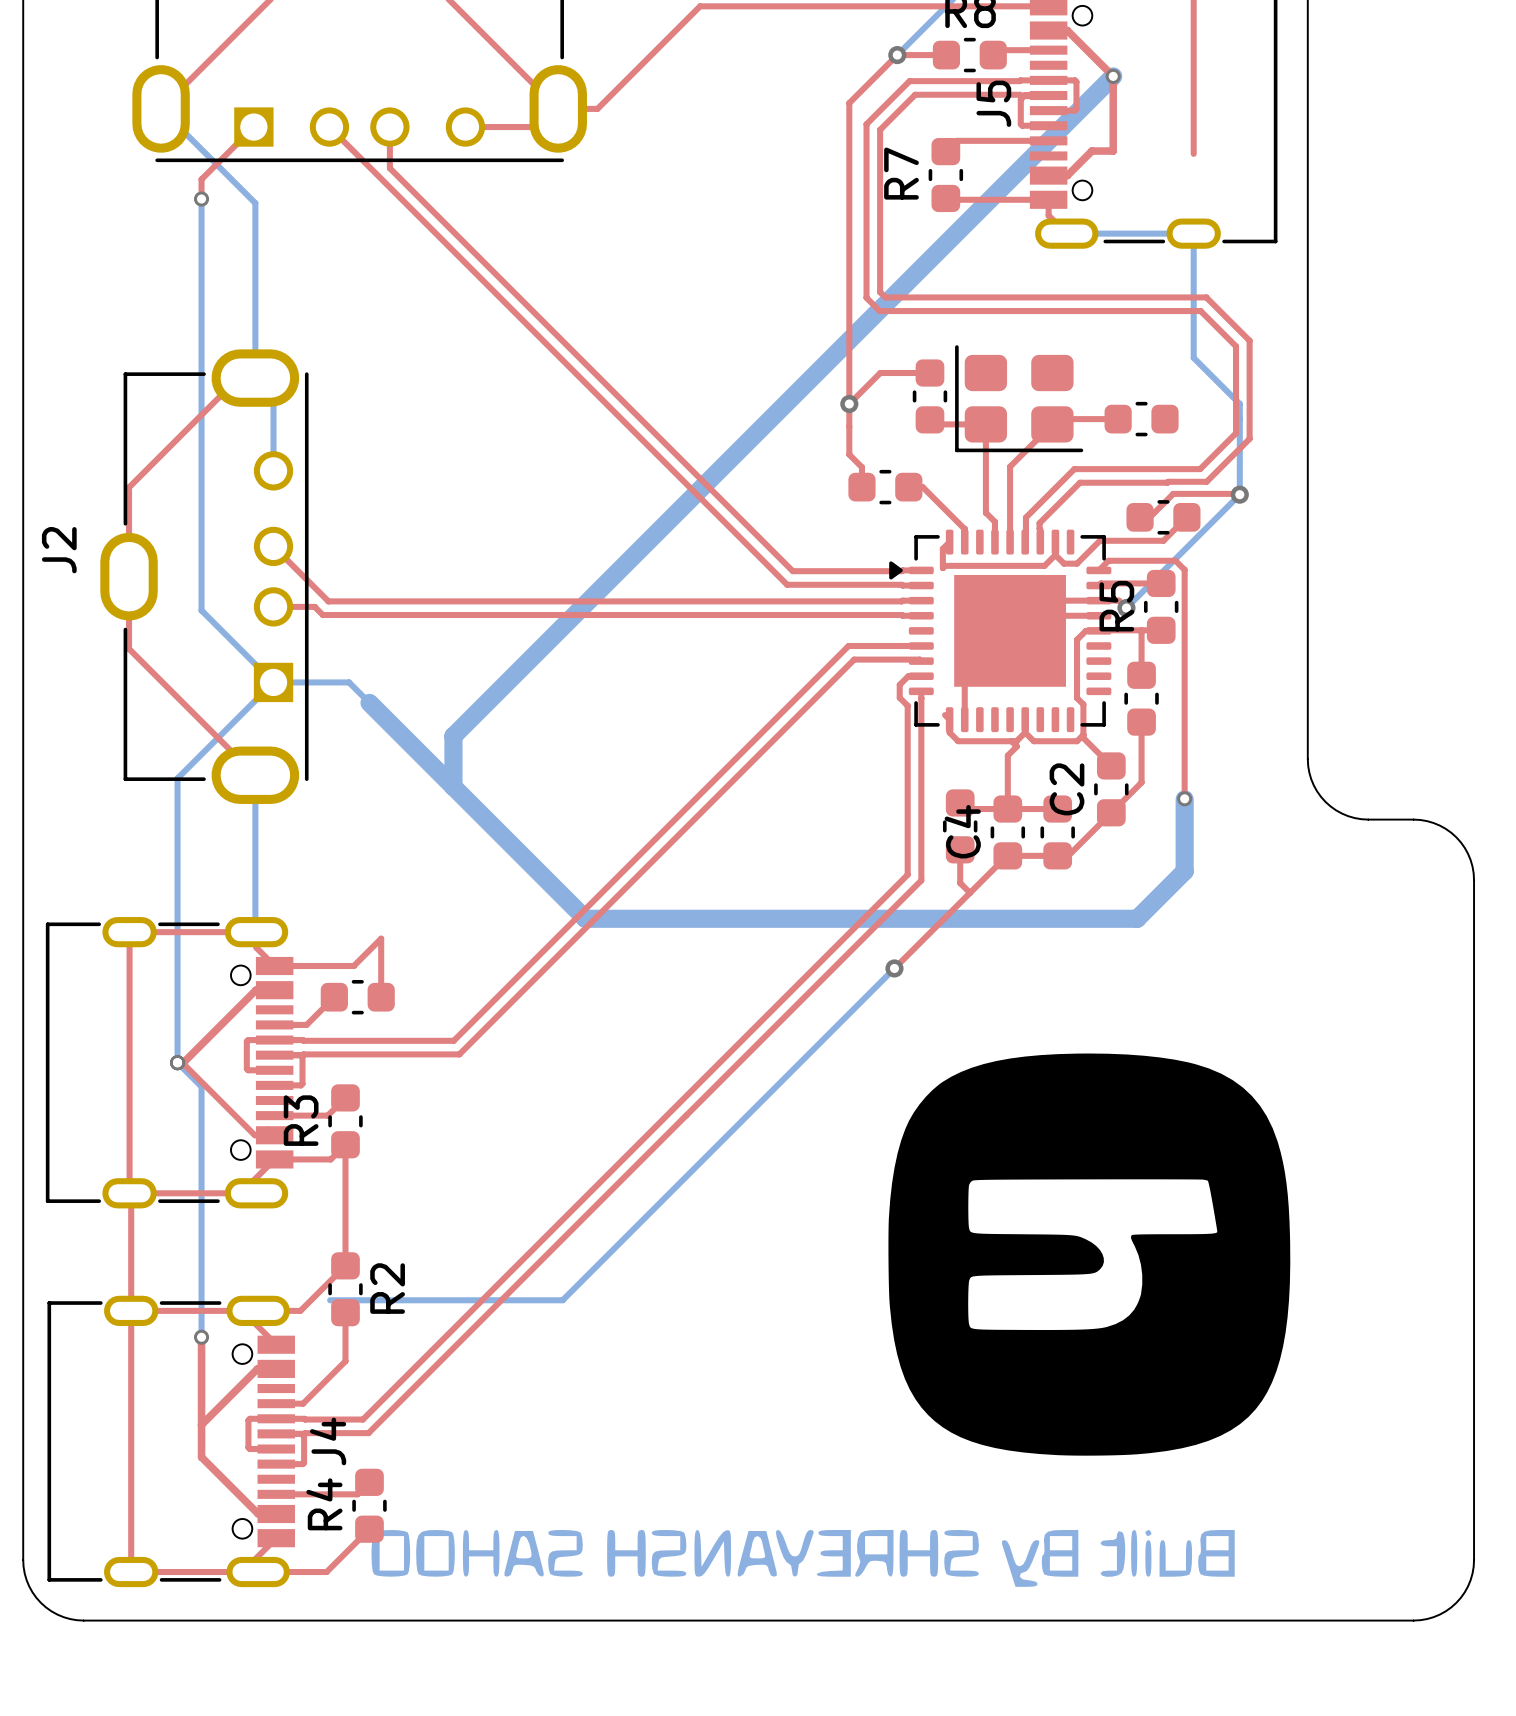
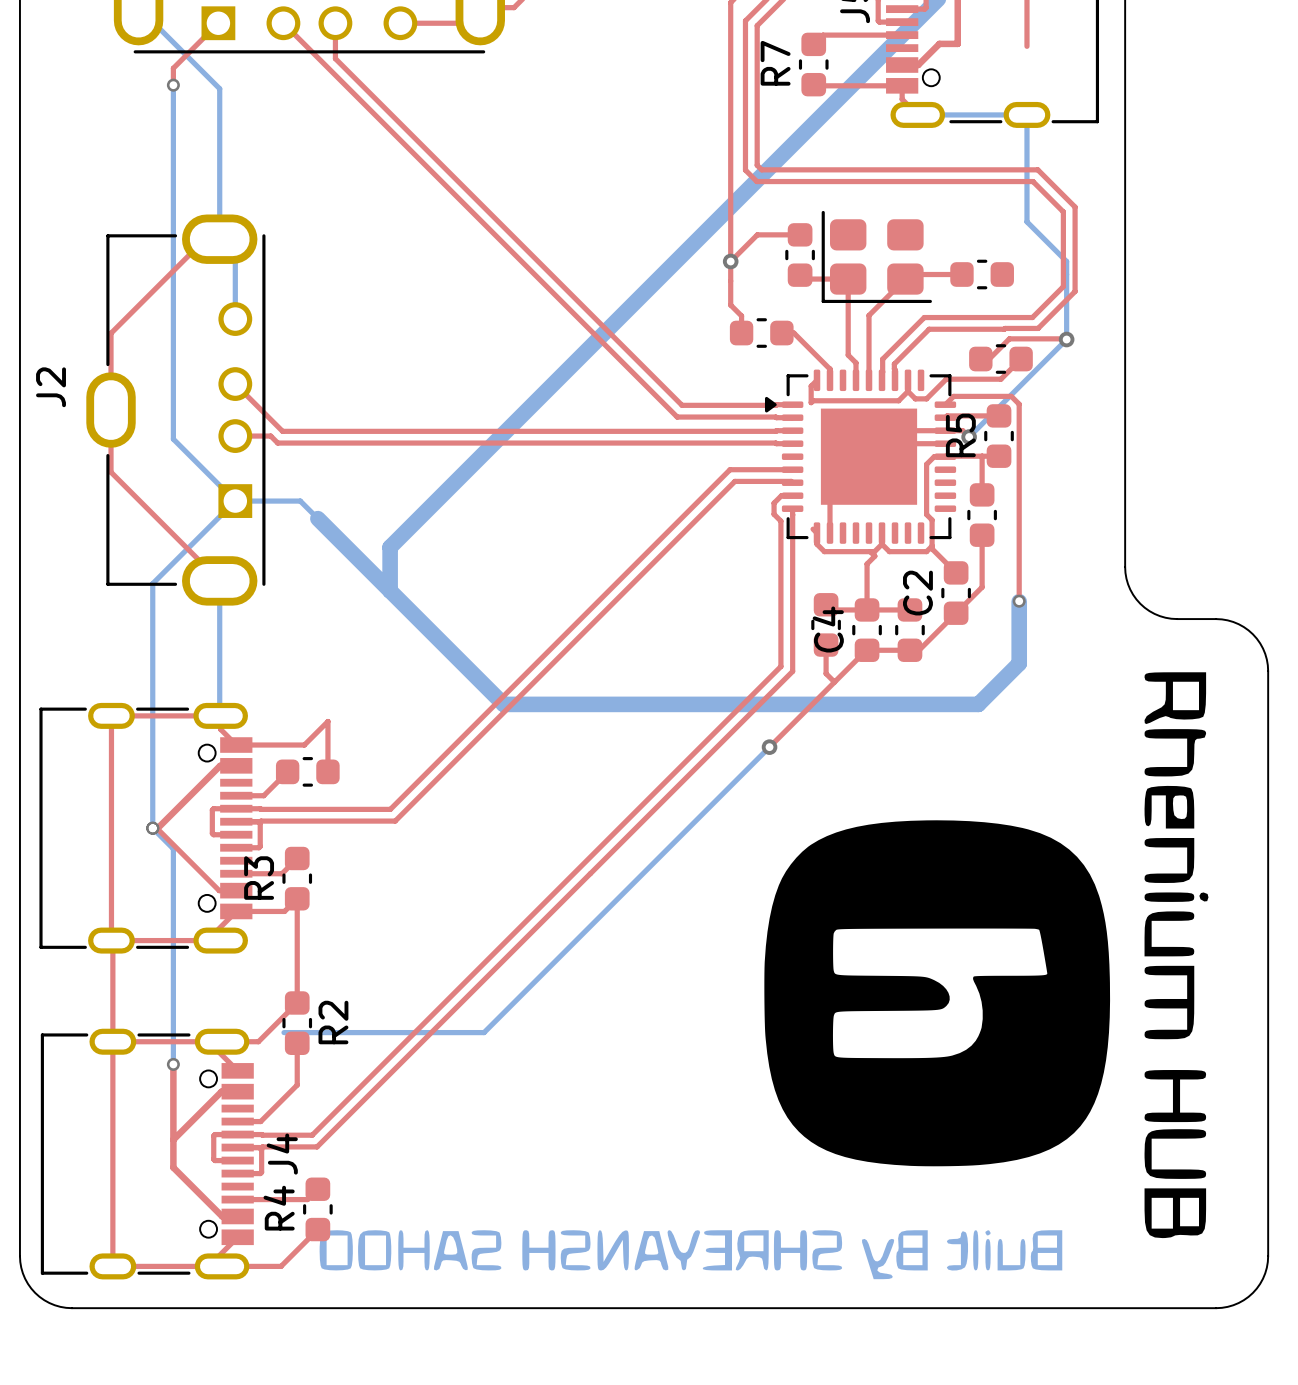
drawing: none -> [1144, 672, 1209, 1239]

